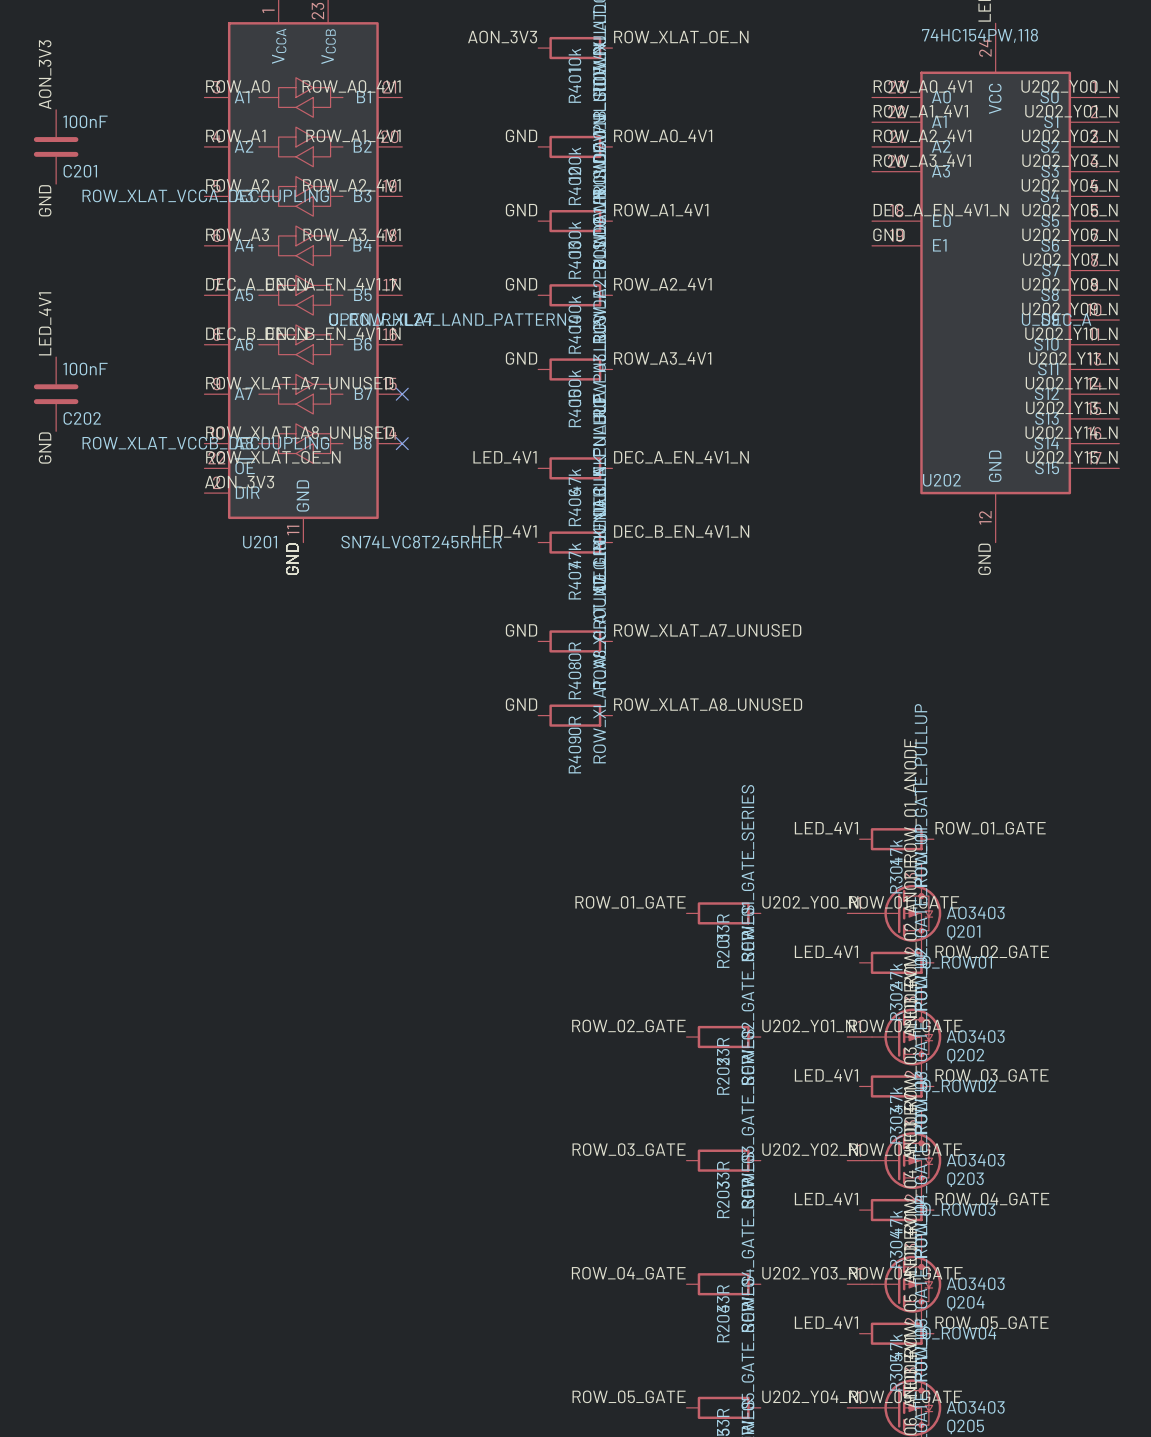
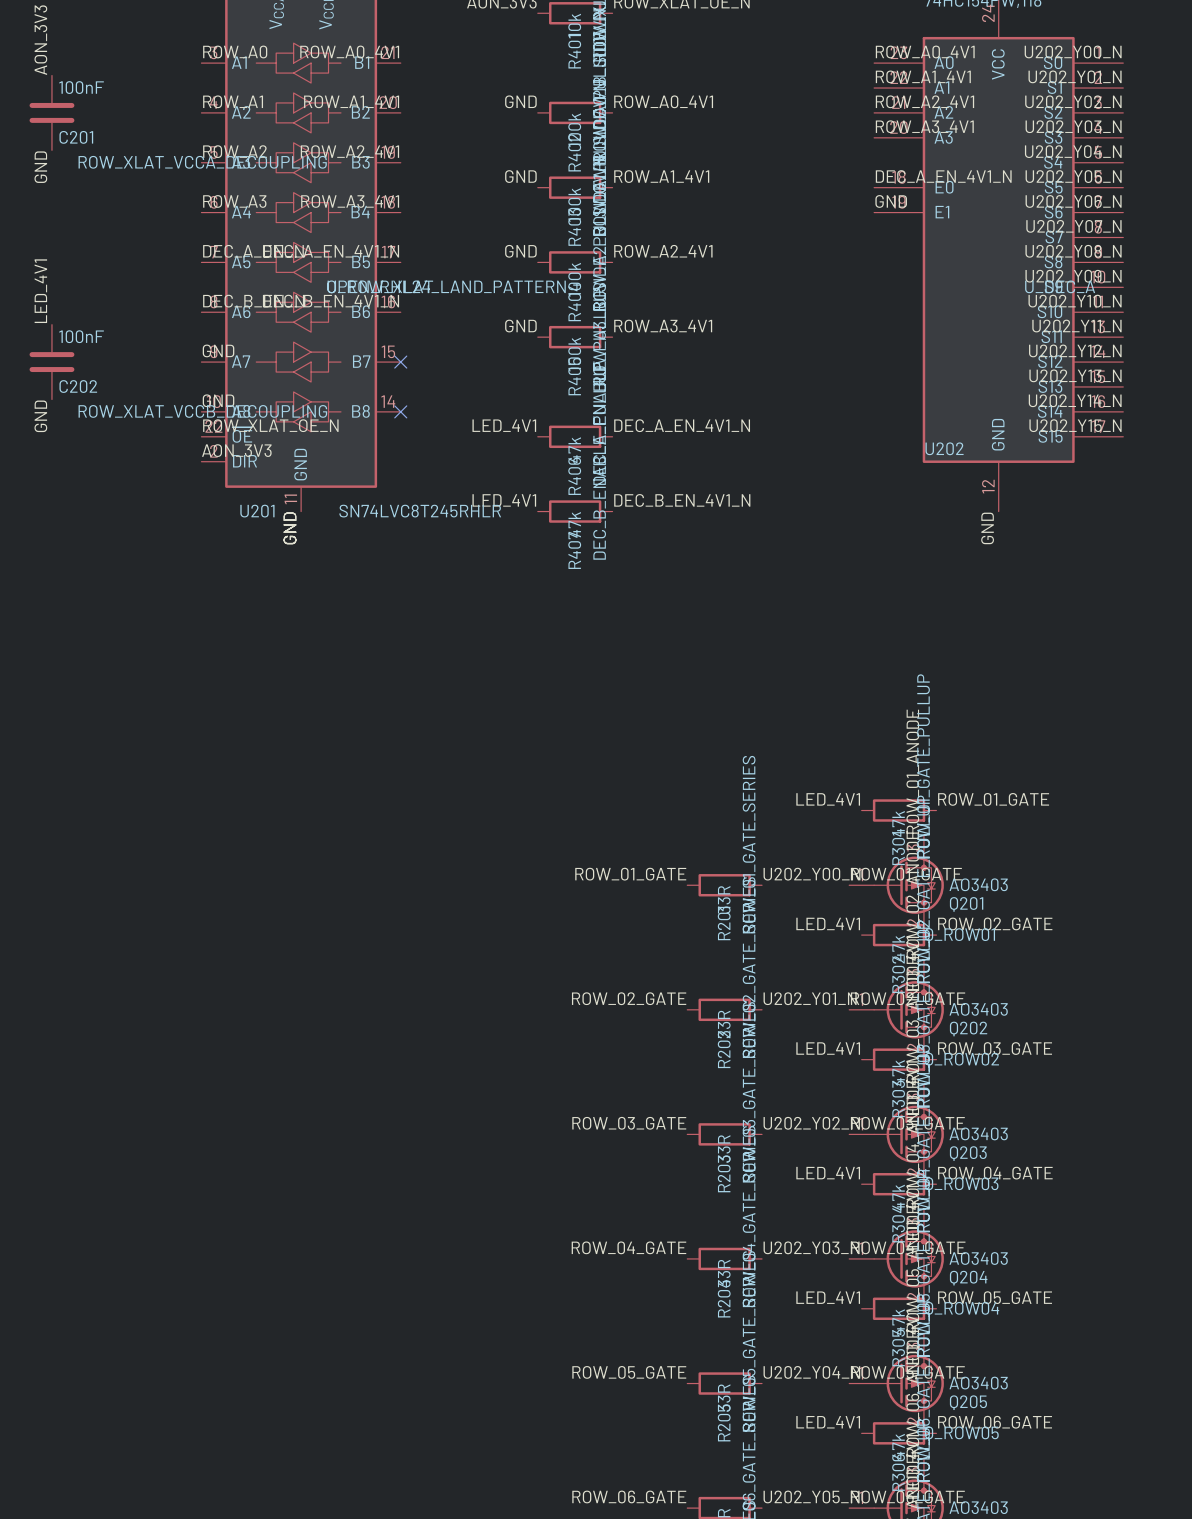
label: ROW_XLAT_A7_UNUSED (299, 383) -> GND (218, 350)
label: ROW_XLAT_A8_UNUSED (300, 432) -> GND (218, 400)
label: GND (521, 630) -> none
label: ROW_XLAT_A7_UNUSED (707, 630) -> none
R408: 0R (575, 641) -> none
label: GND (521, 704) -> none
label: ROW_XLAT_A8_UNUSED (708, 704) -> none
R409: 0R (575, 715) -> none

